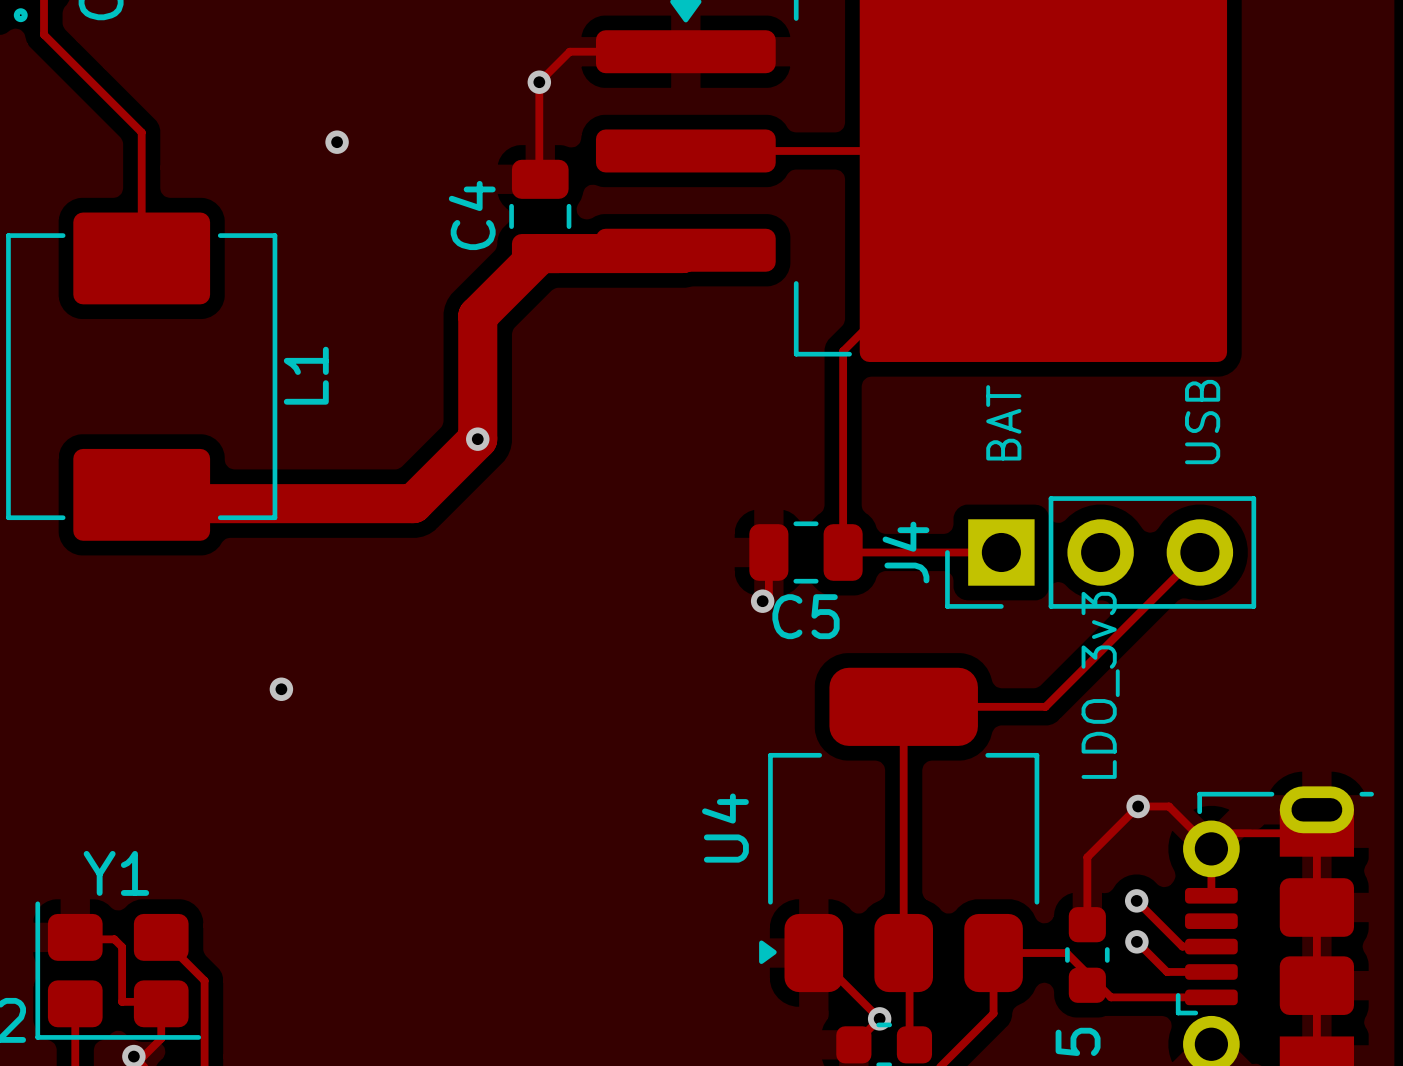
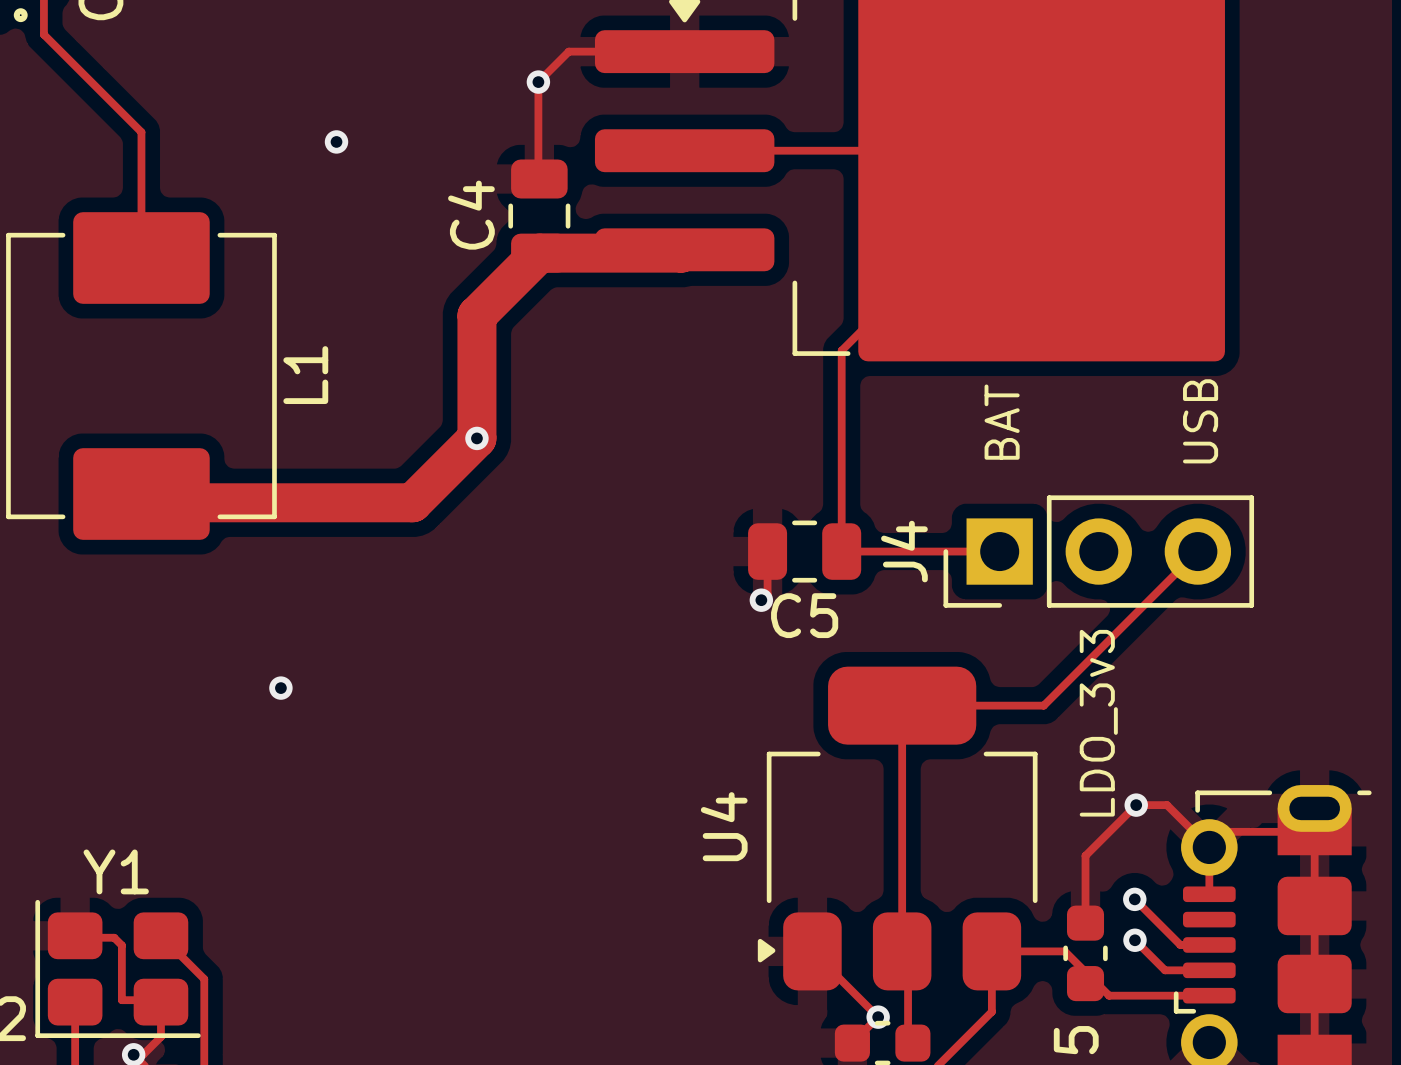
text position: LDO_3v3 (1100, 685) -> LDO_3v3 (1098, 723)

